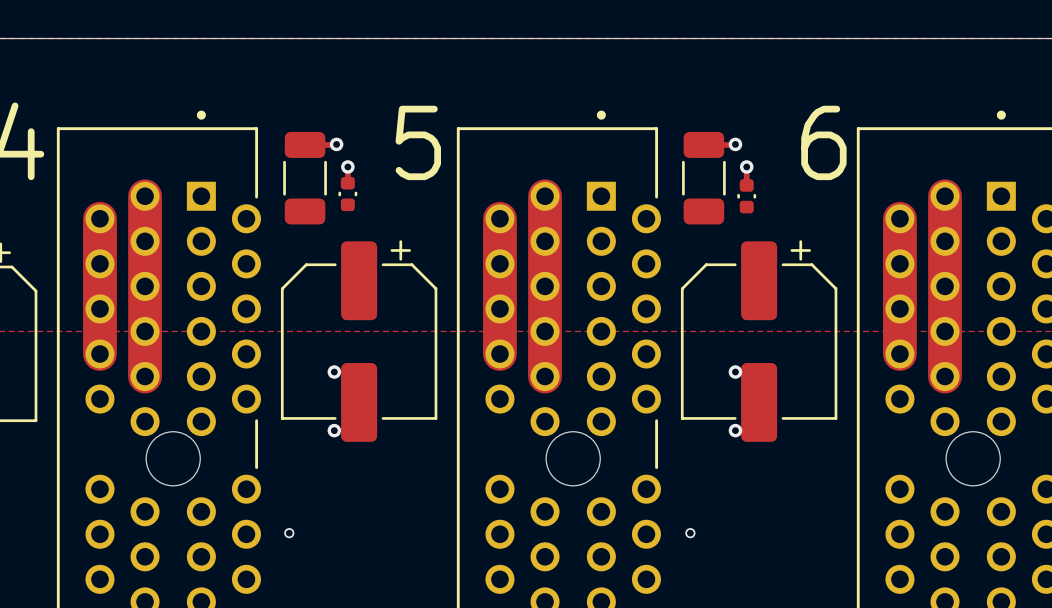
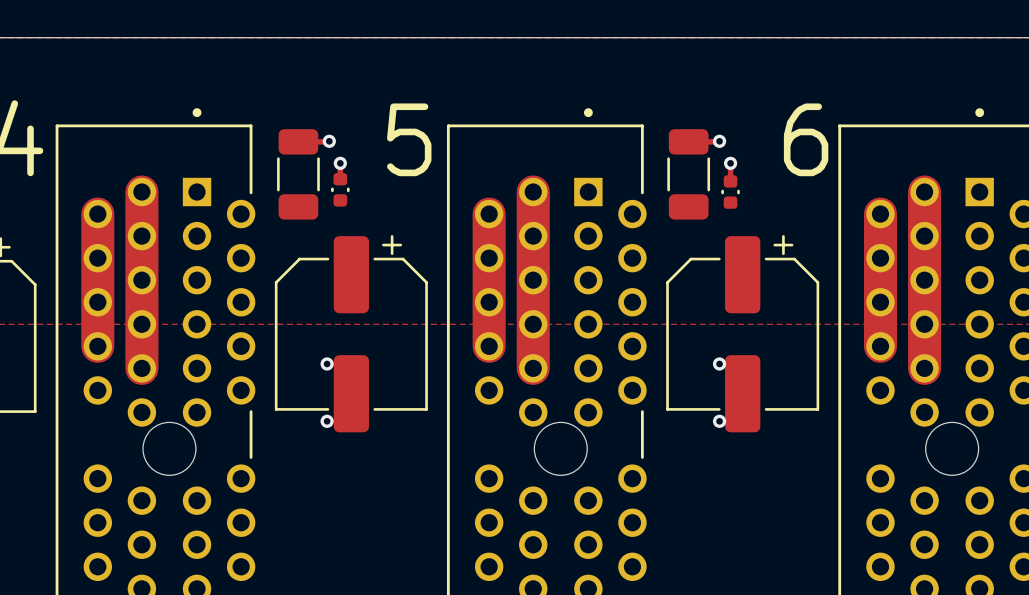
via: (289, 533) -> none
via: (690, 533) -> none

